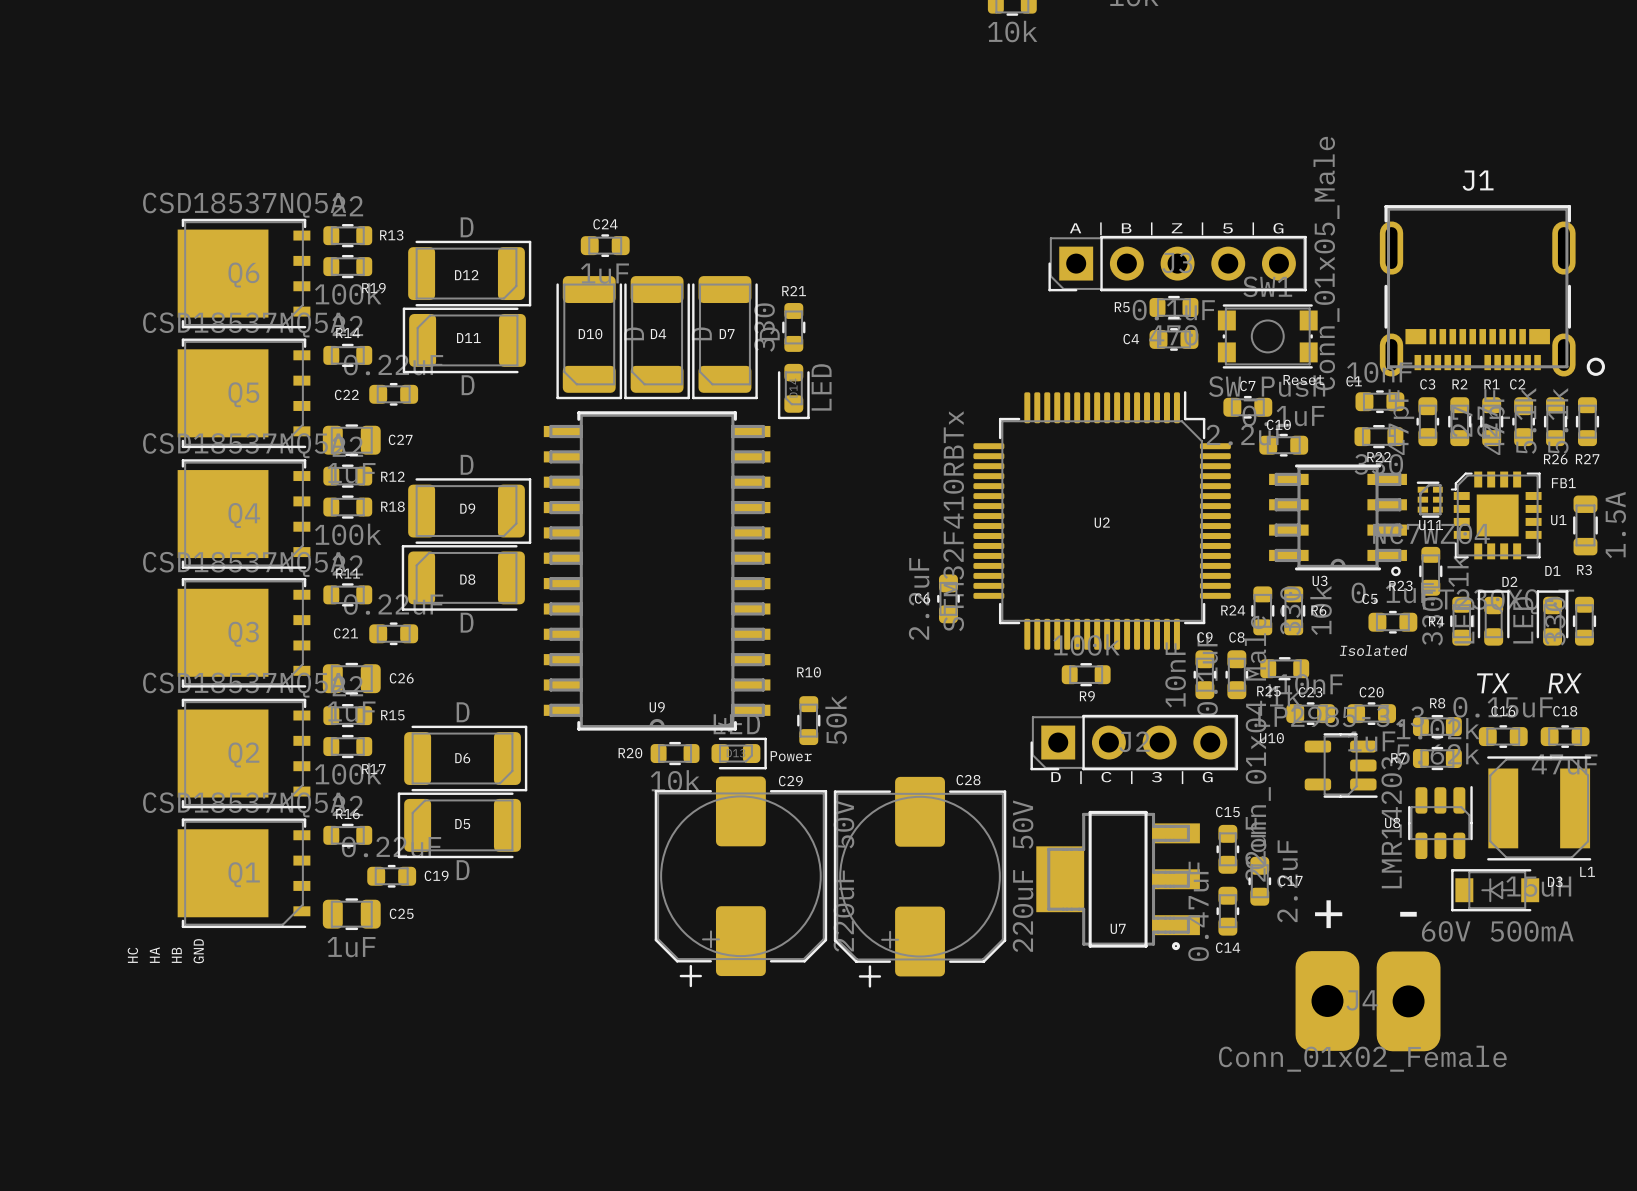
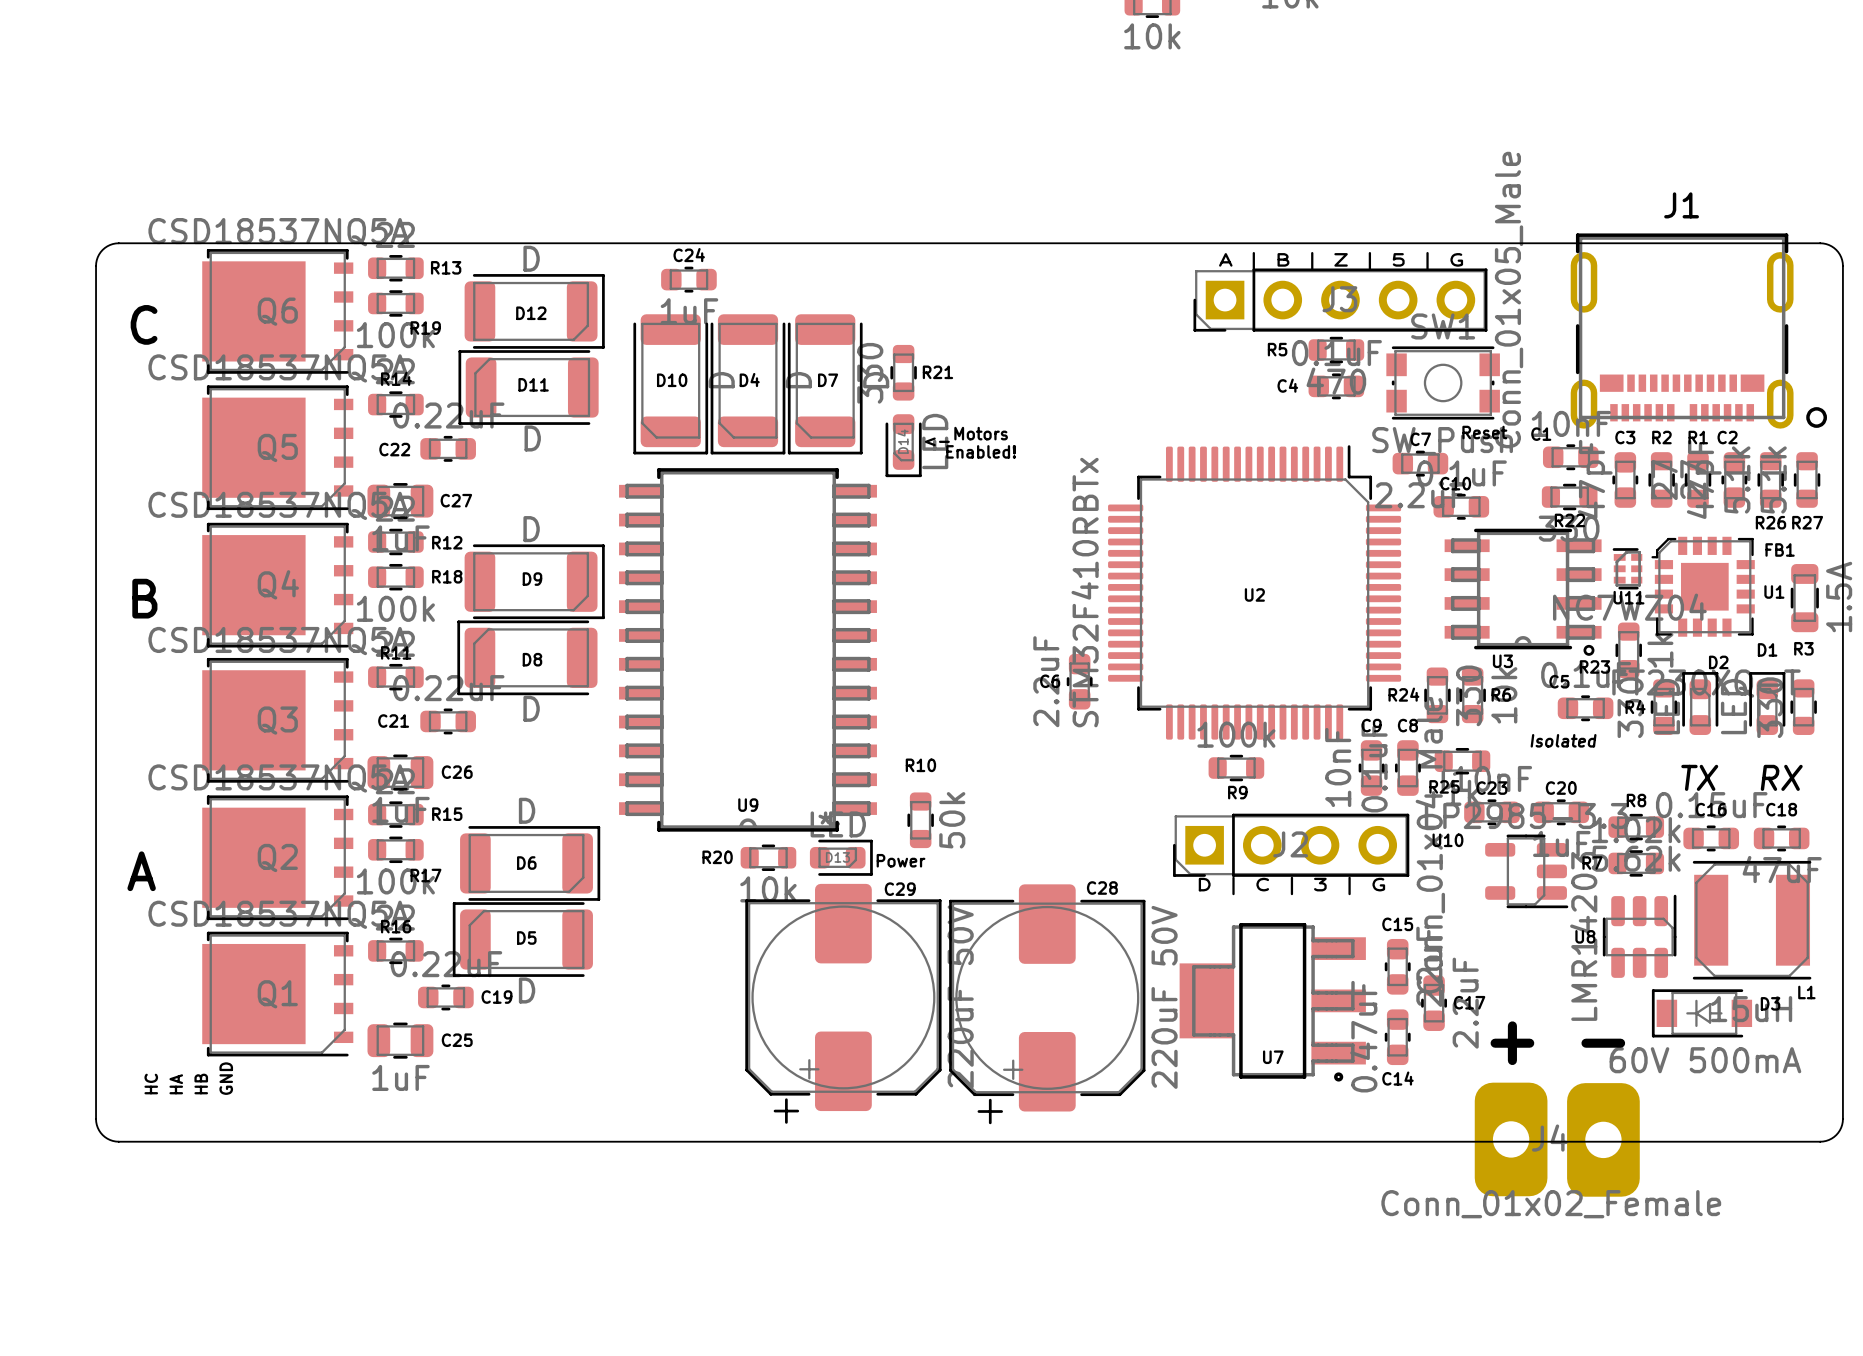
board edge: none -> (118, 243) (1820, 243) (1831, 246) (1839, 254) (1842, 265) (1842, 1119) (1839, 1130) (1831, 1138) (1820, 1141) (118, 1141) (107, 1138) (99, 1130) (96, 1119) (96, 265) (97, 257) (102, 249) (110, 245) (118, 243)
text: none -> C (144, 324)
R21 name position: R21 (794, 291) -> R21 (937, 372)
text: none -> Motors (981, 433)
text: none -> <- (937, 441)
text: none -> Enabled! (981, 451)
text: none -> B (144, 598)
text: none -> A (141, 871)

